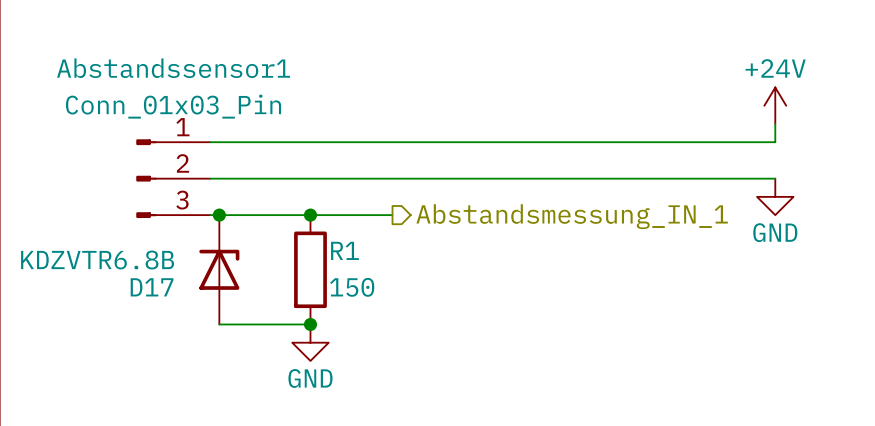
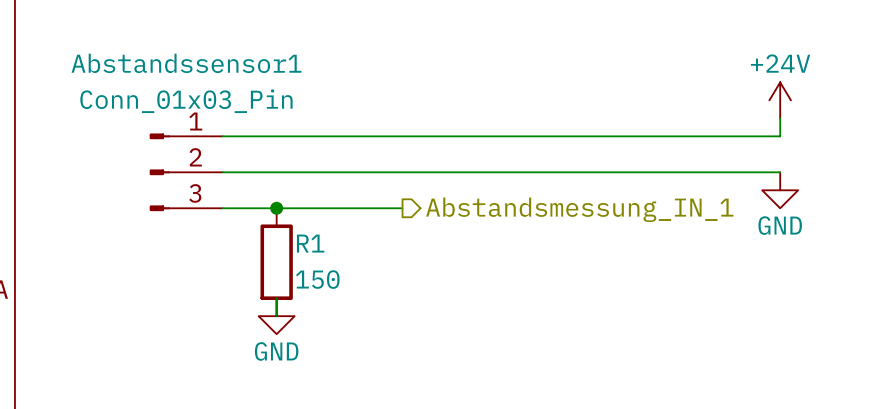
junction: (219, 215) -> none
junction: none -> (276, 208)
junction: (310, 215) -> none
D17: KDZVTR6.8B (219, 269) -> none
R1 position: (310, 269) -> (276, 262)
wire: none -> (276, 298) (276, 316)
wire: (219, 324) (310, 324) -> none
junction: (310, 324) -> none
power symbol position: GND (310, 342) -> GND (276, 316)

